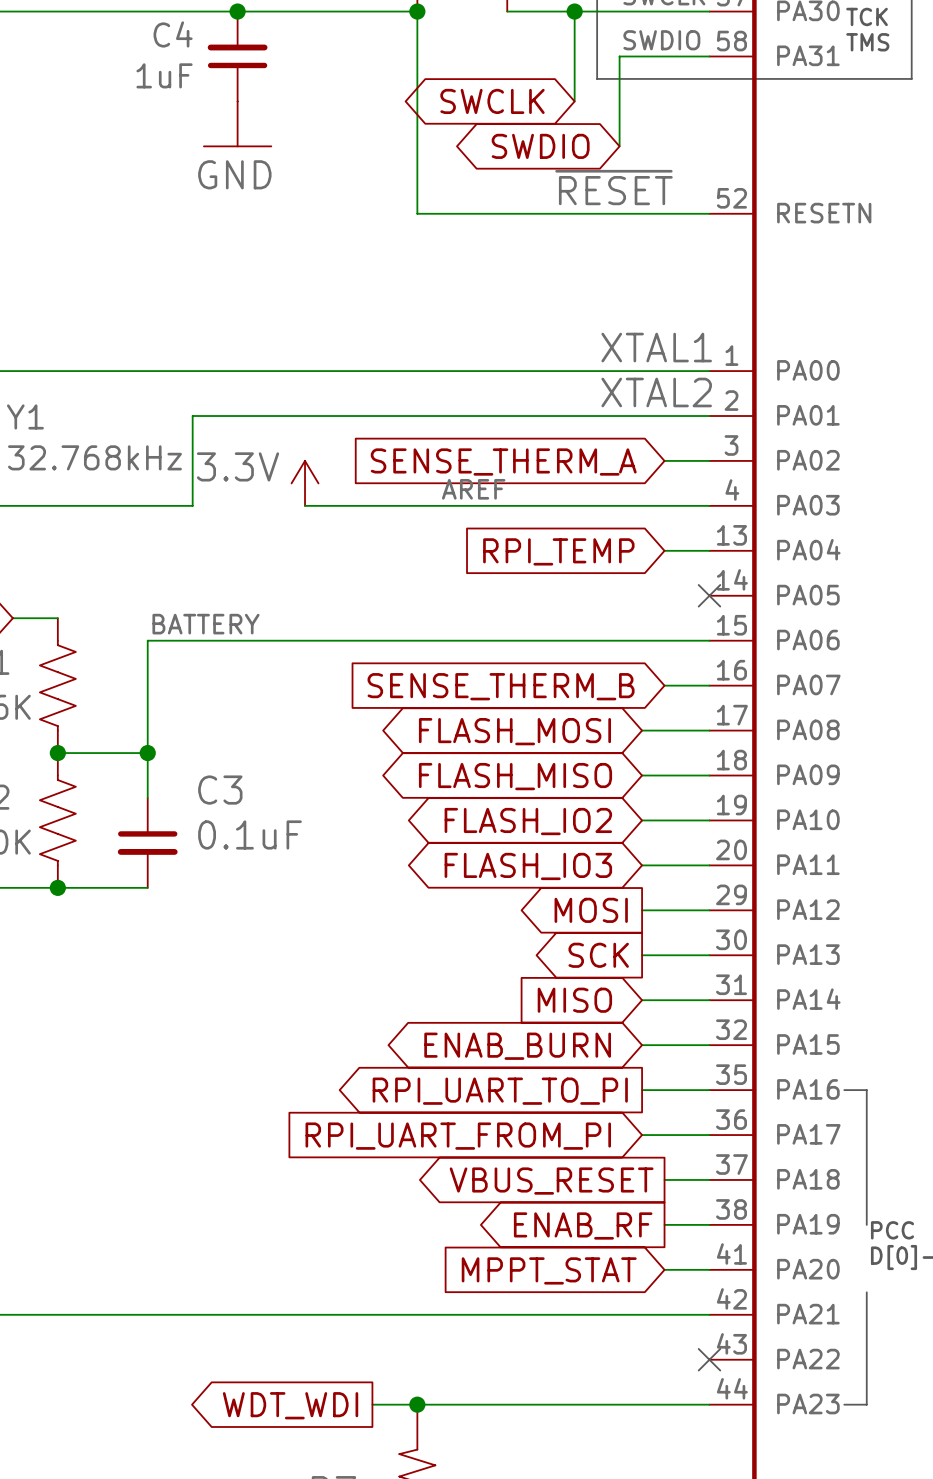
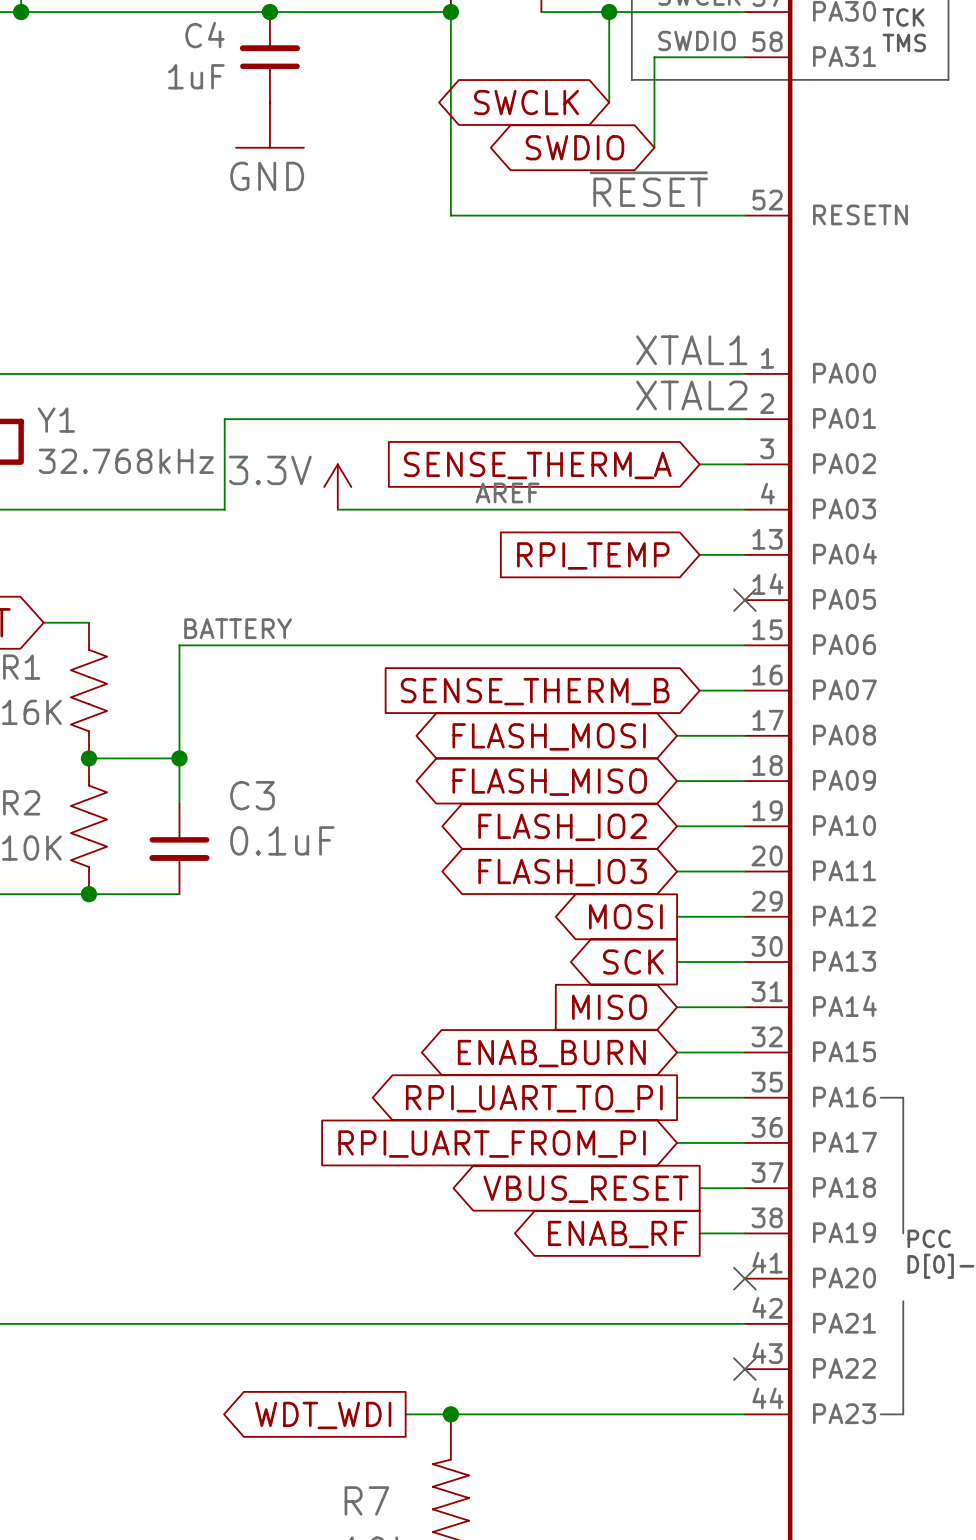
wire: (664, 1269) (709, 1269) -> none
no-connect mark: none -> (744, 1278)
global label: MPPT_STAT (549, 1270) -> none

